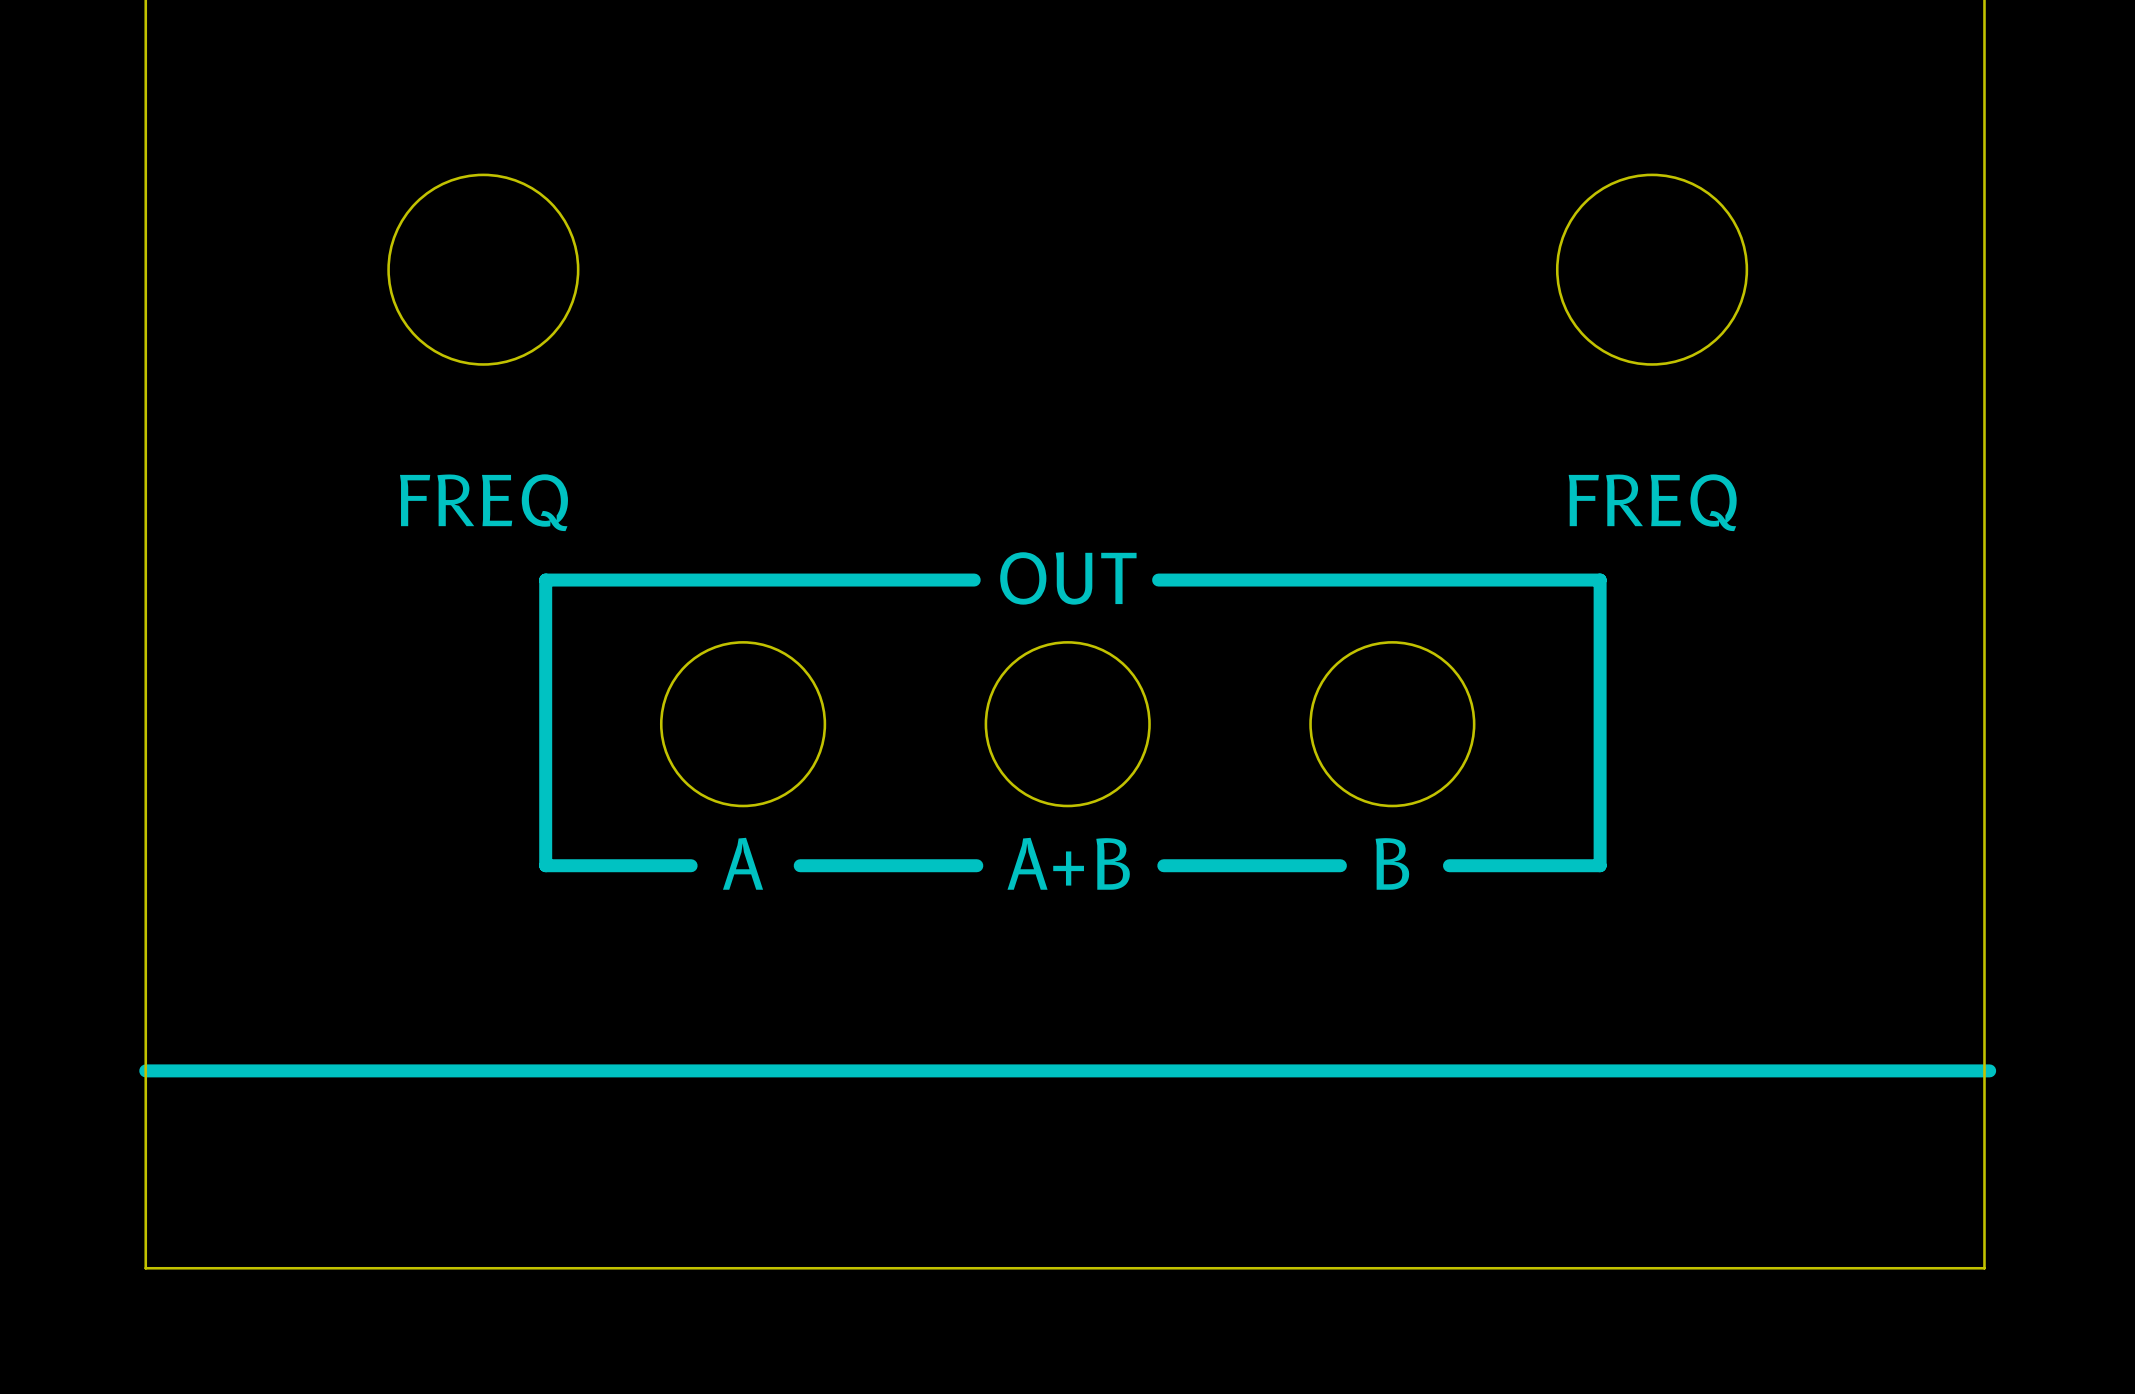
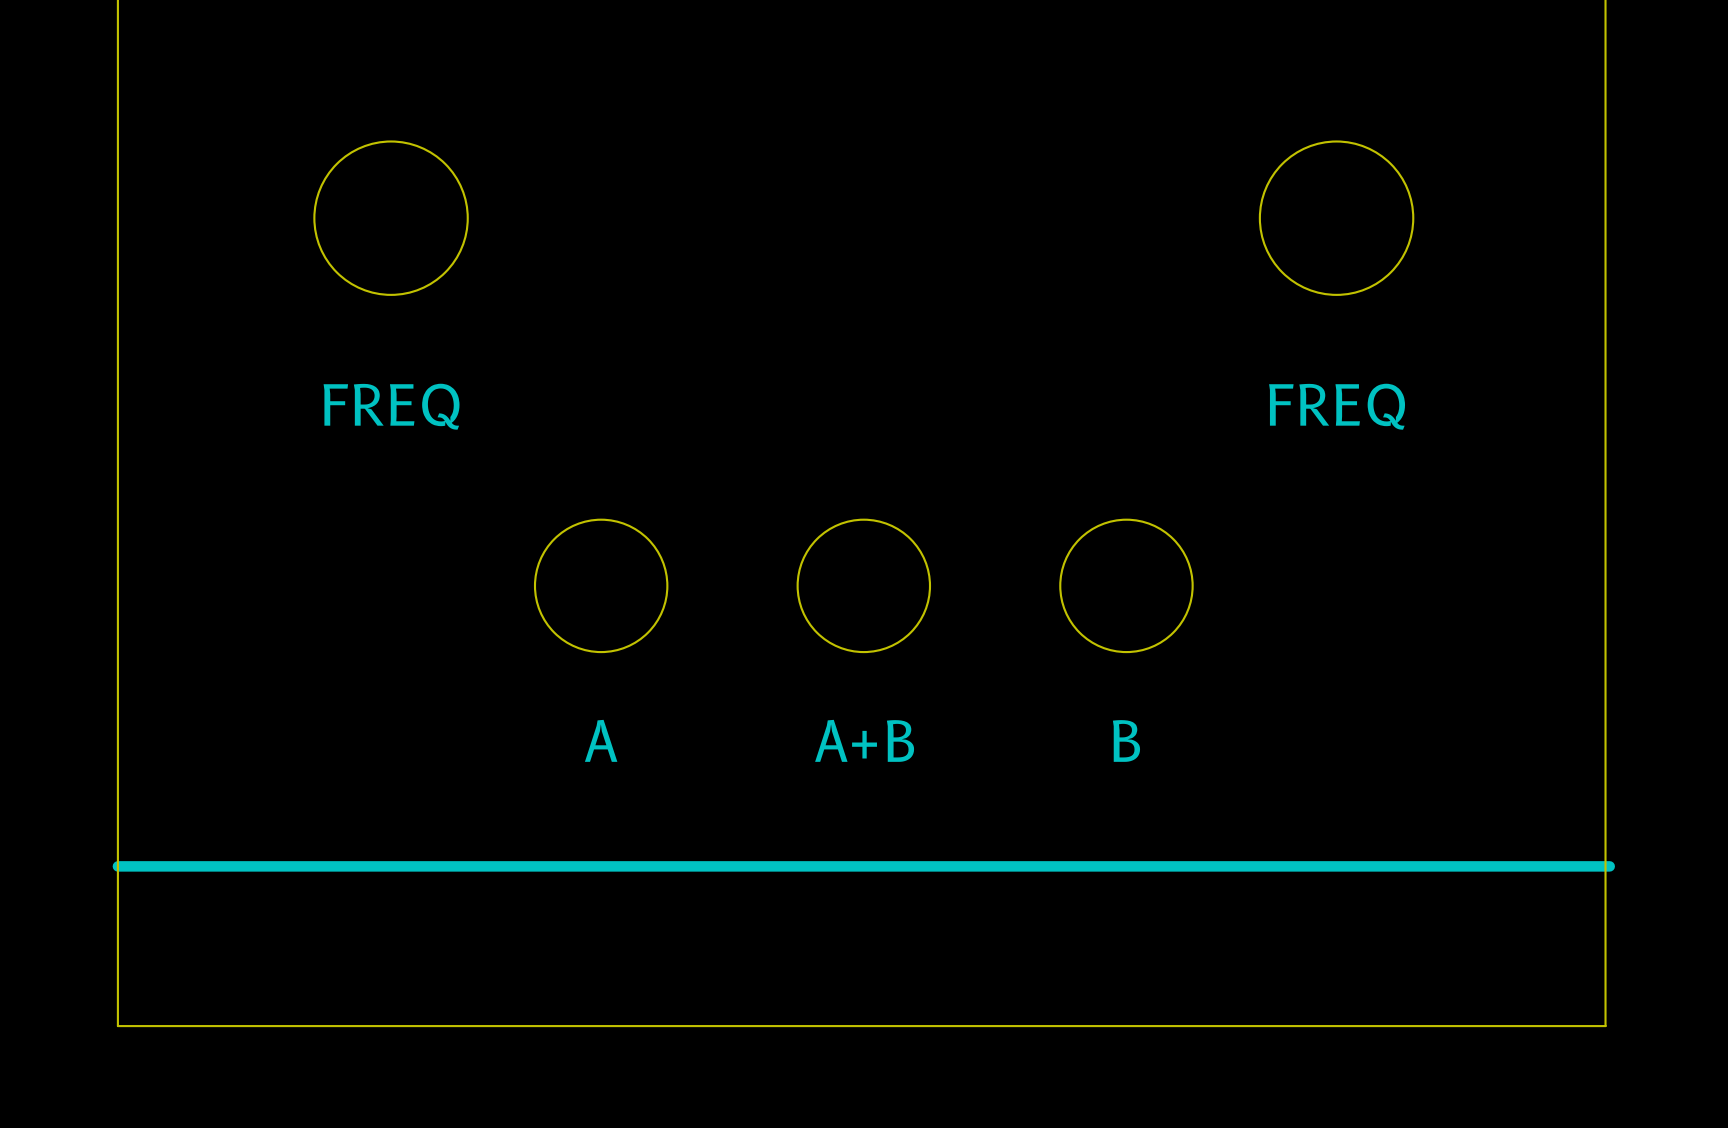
text: OUT (1068, 578) -> none
line: (974, 580) (545, 580) (545, 865) (691, 865) -> none
line: (1158, 580) (1600, 580) (1600, 865) (1449, 865) -> none
text position: A (743, 863) -> A (601, 740)
text position: A+B (1068, 863) -> A+B (864, 740)
text position: B (1392, 863) -> B (1126, 740)
line: (800, 865) (976, 865) -> none
line: (1163, 865) (1340, 865) -> none

